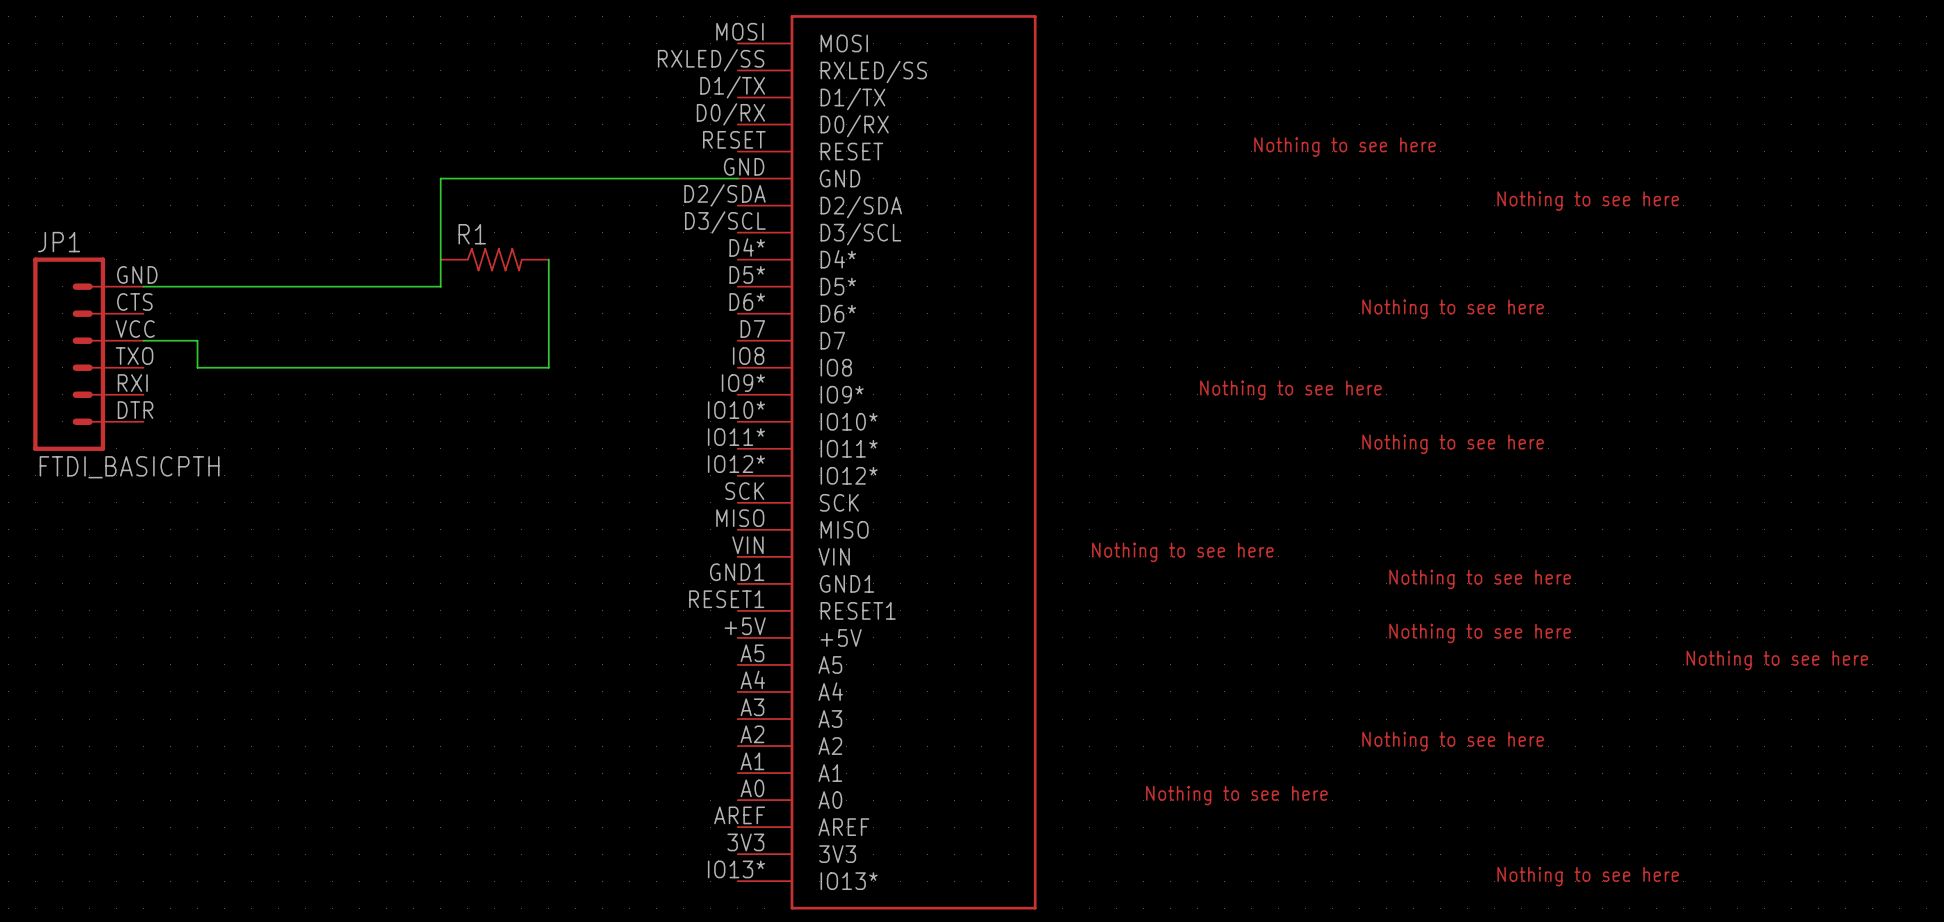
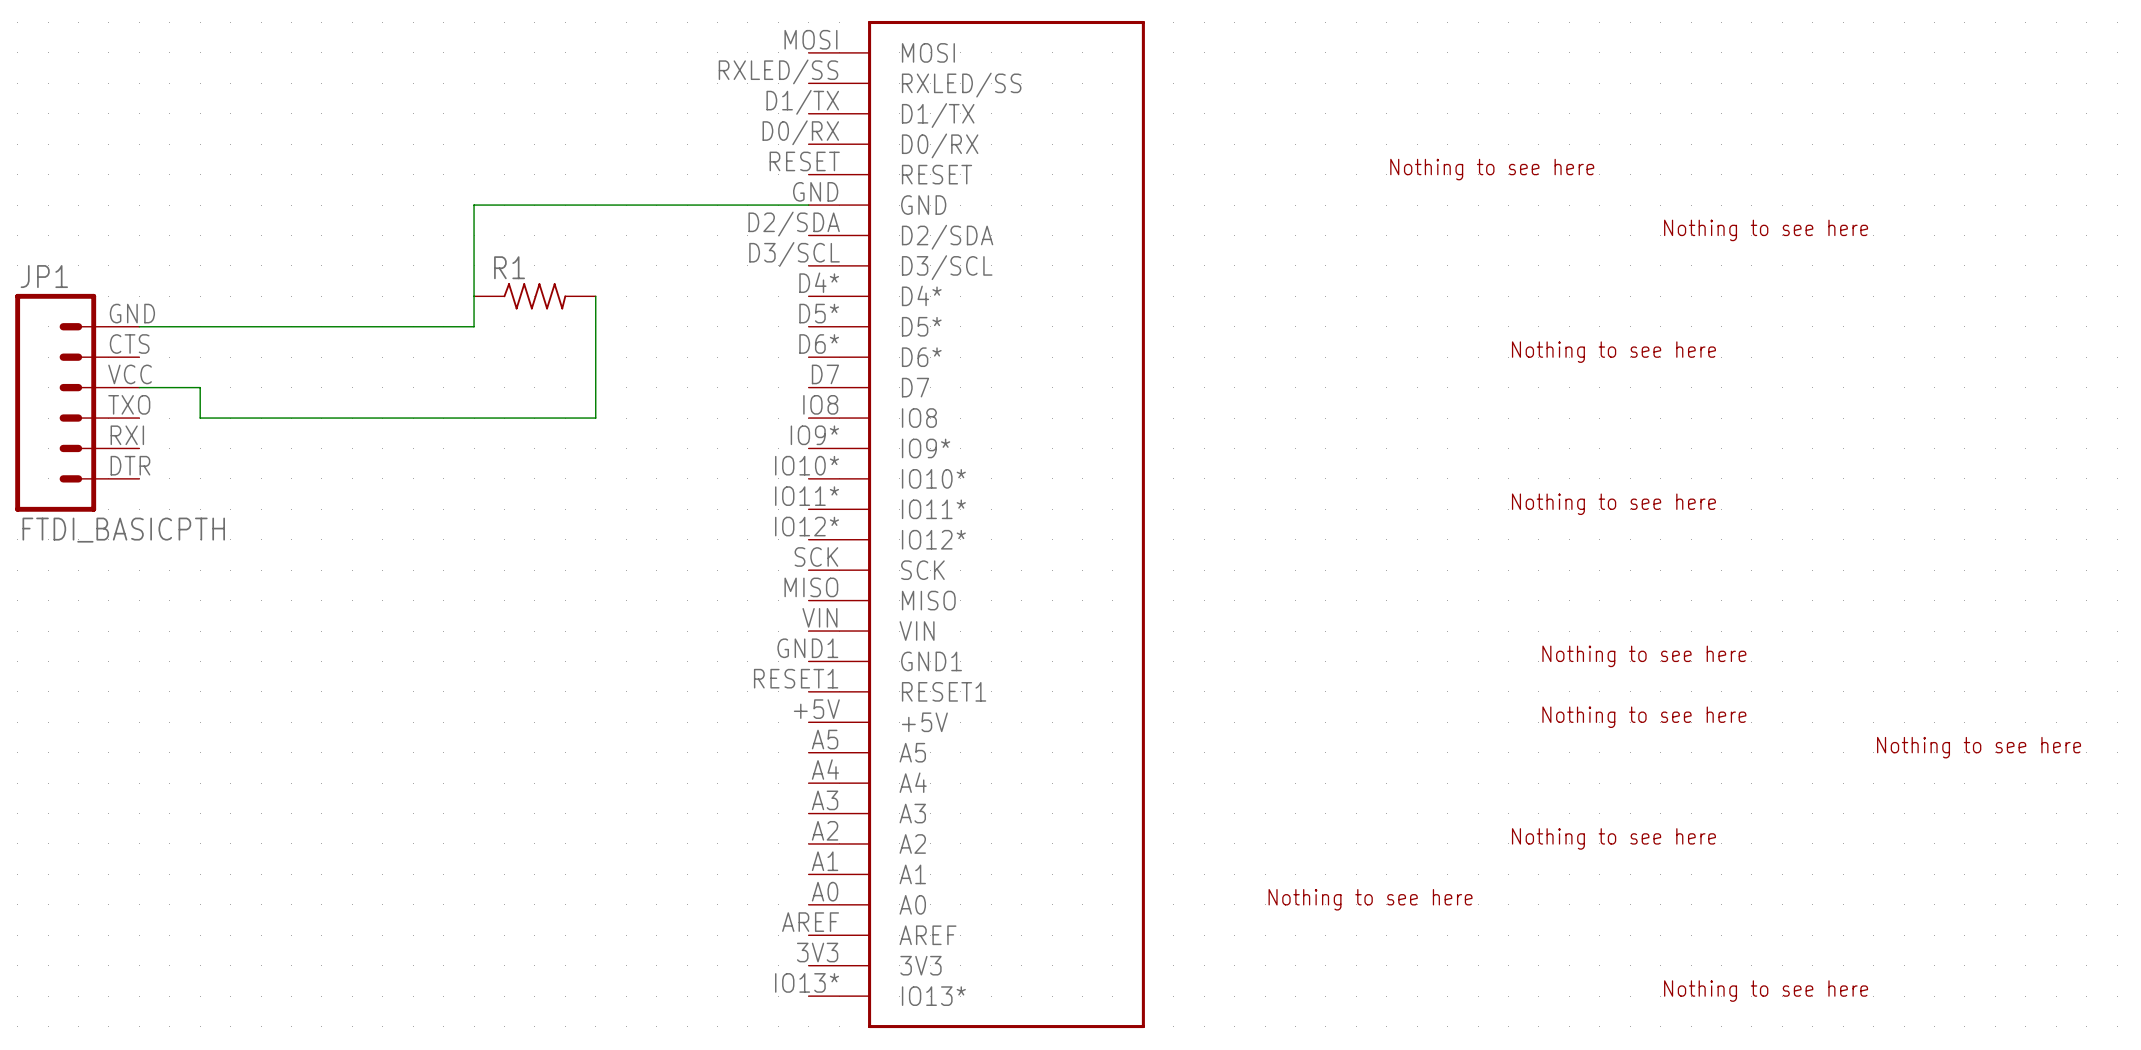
part: (1290, 390) -> none
part: (1182, 552) -> none

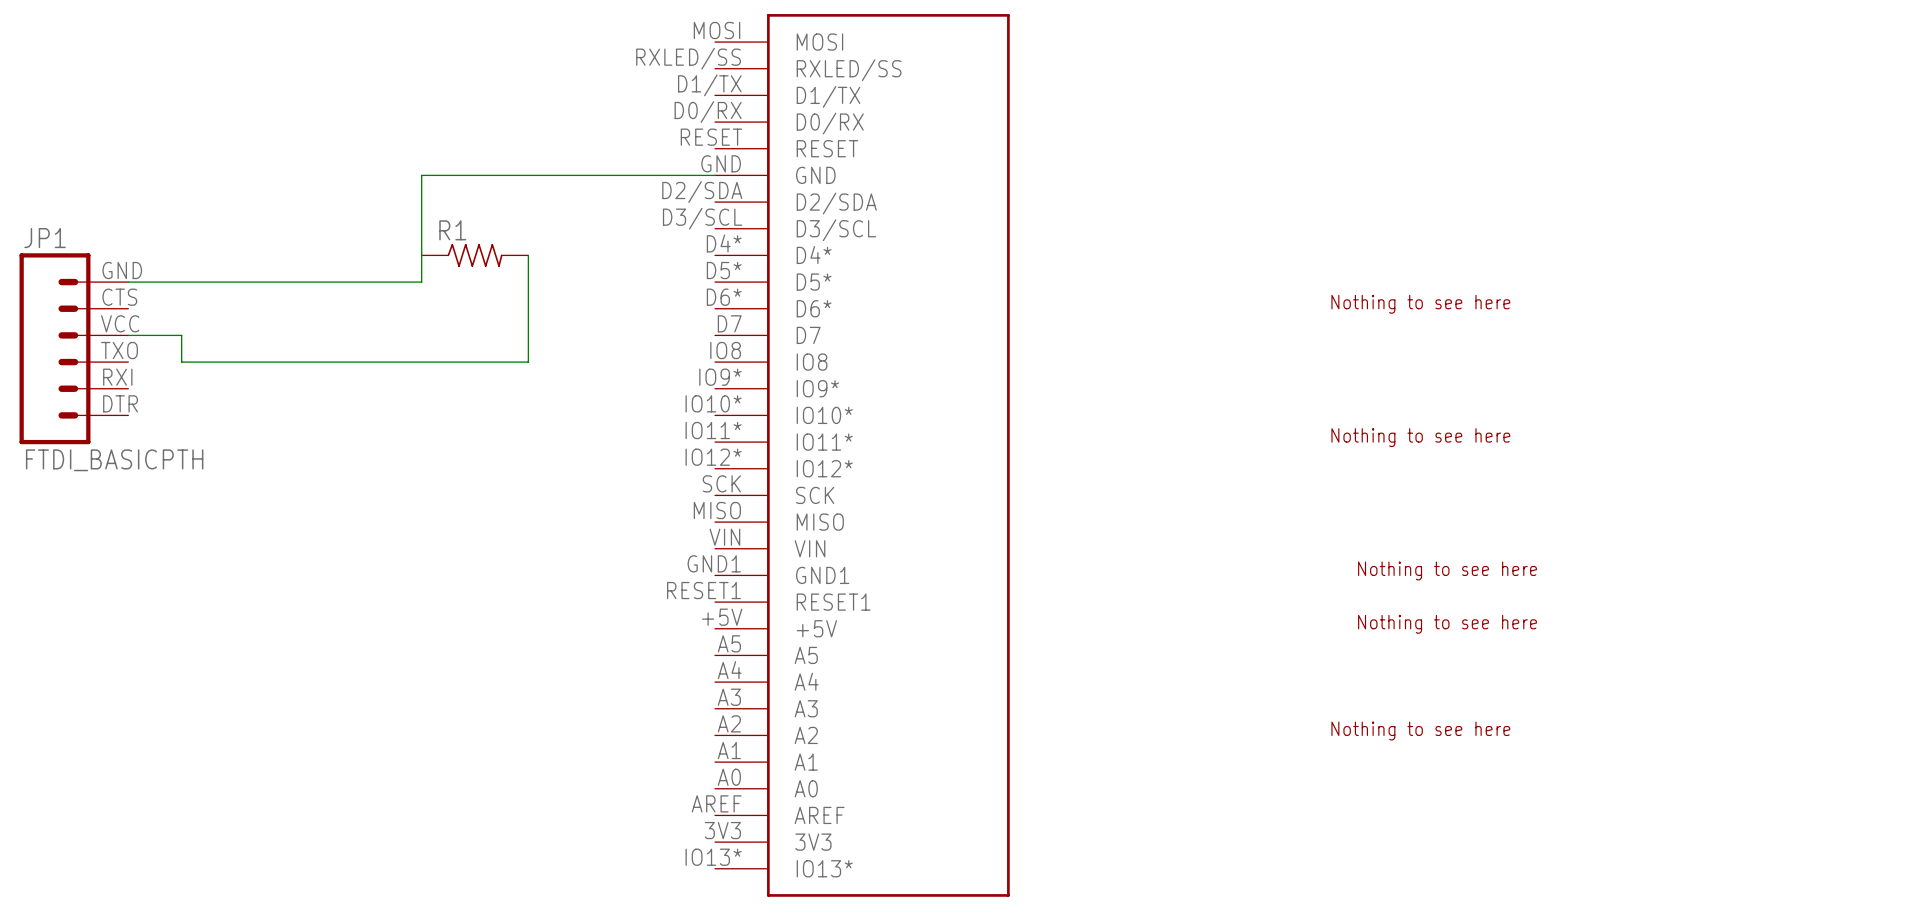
part: (1492, 169) -> none
part: (1766, 230) -> none
part: (1979, 747) -> none
part: (1370, 899) -> none
part: (1766, 991) -> none

